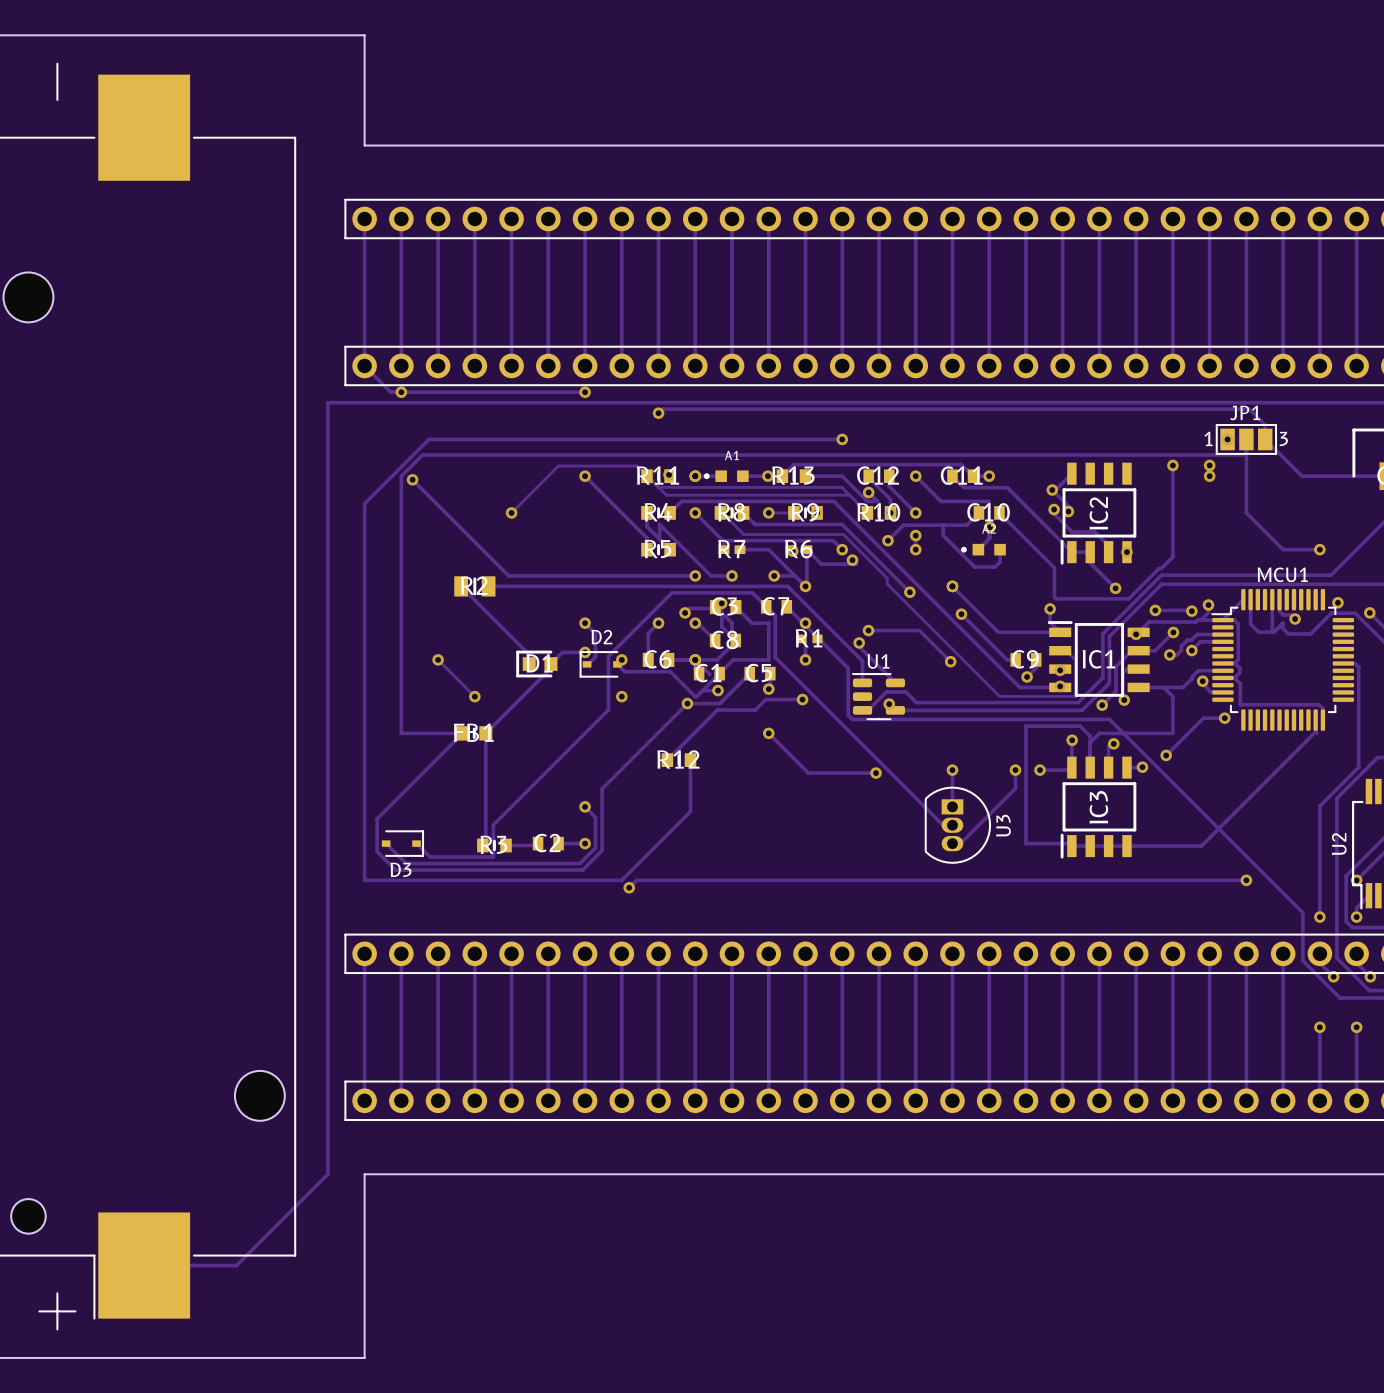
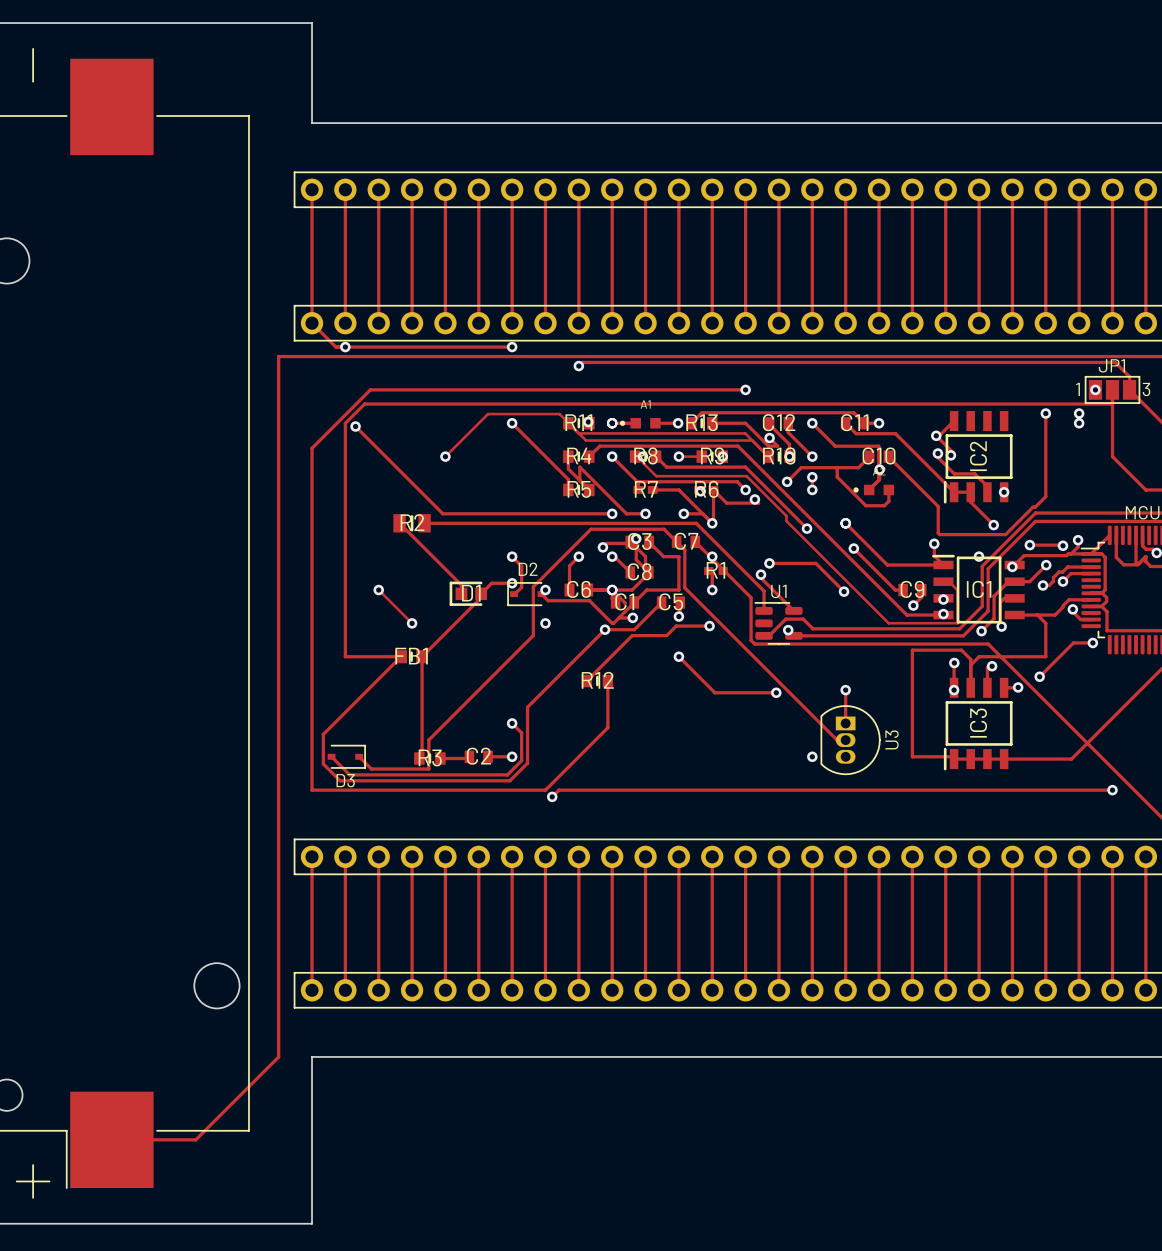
via: none -> (979, 556)
track: (1015, 770) (1015, 788) (960, 843) -> none
via: (1015, 770) -> none
track: (1039, 770) (1069, 770) -> none
via: (1039, 770) -> none
via: none -> (954, 690)
via: none -> (812, 756)

